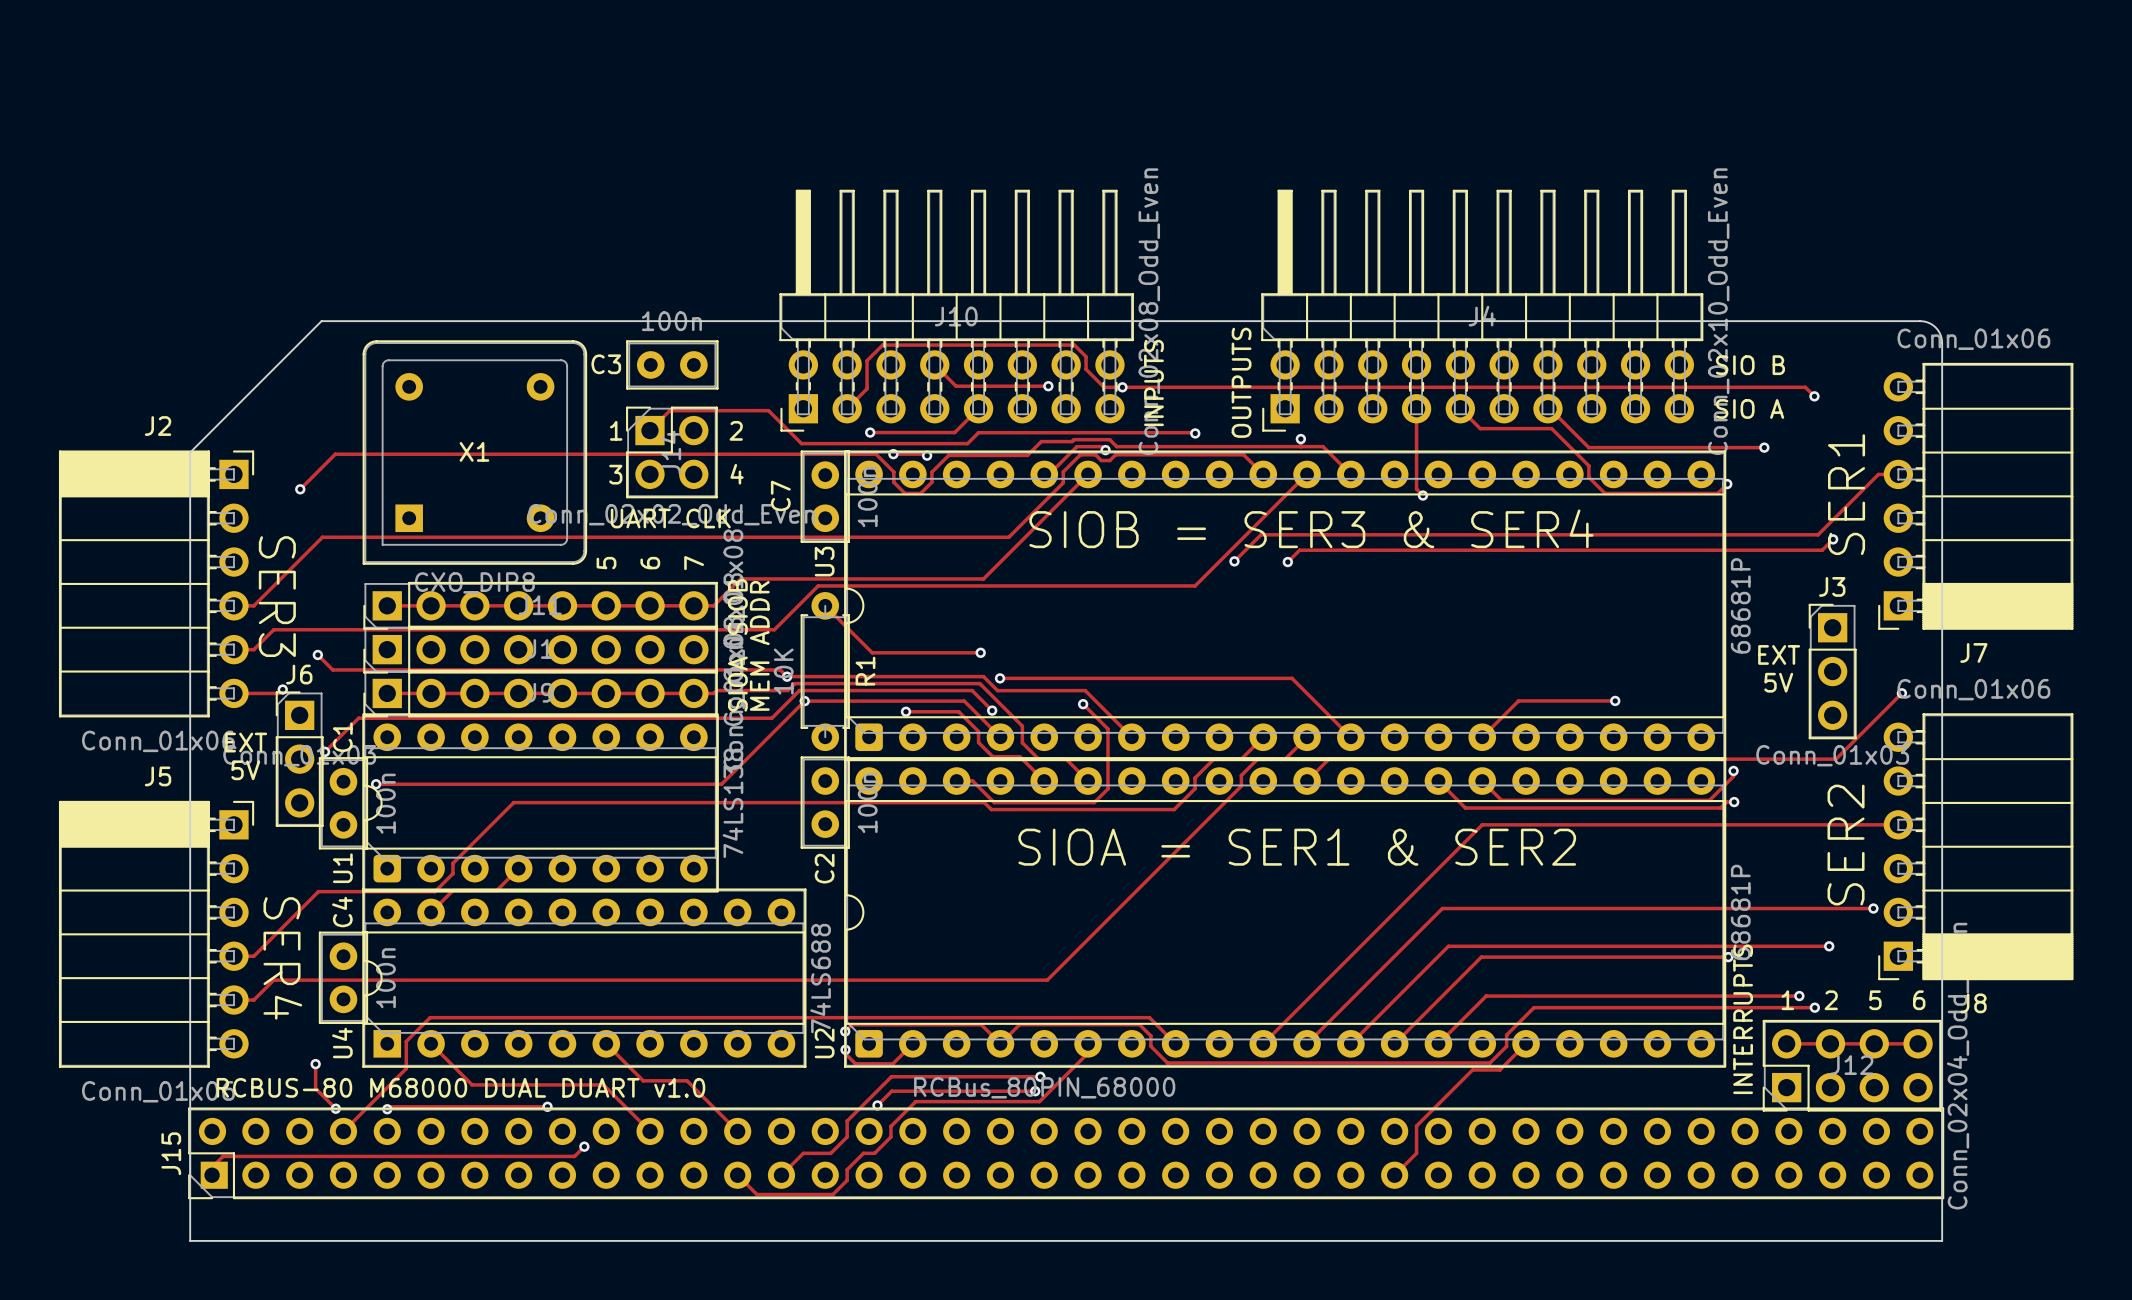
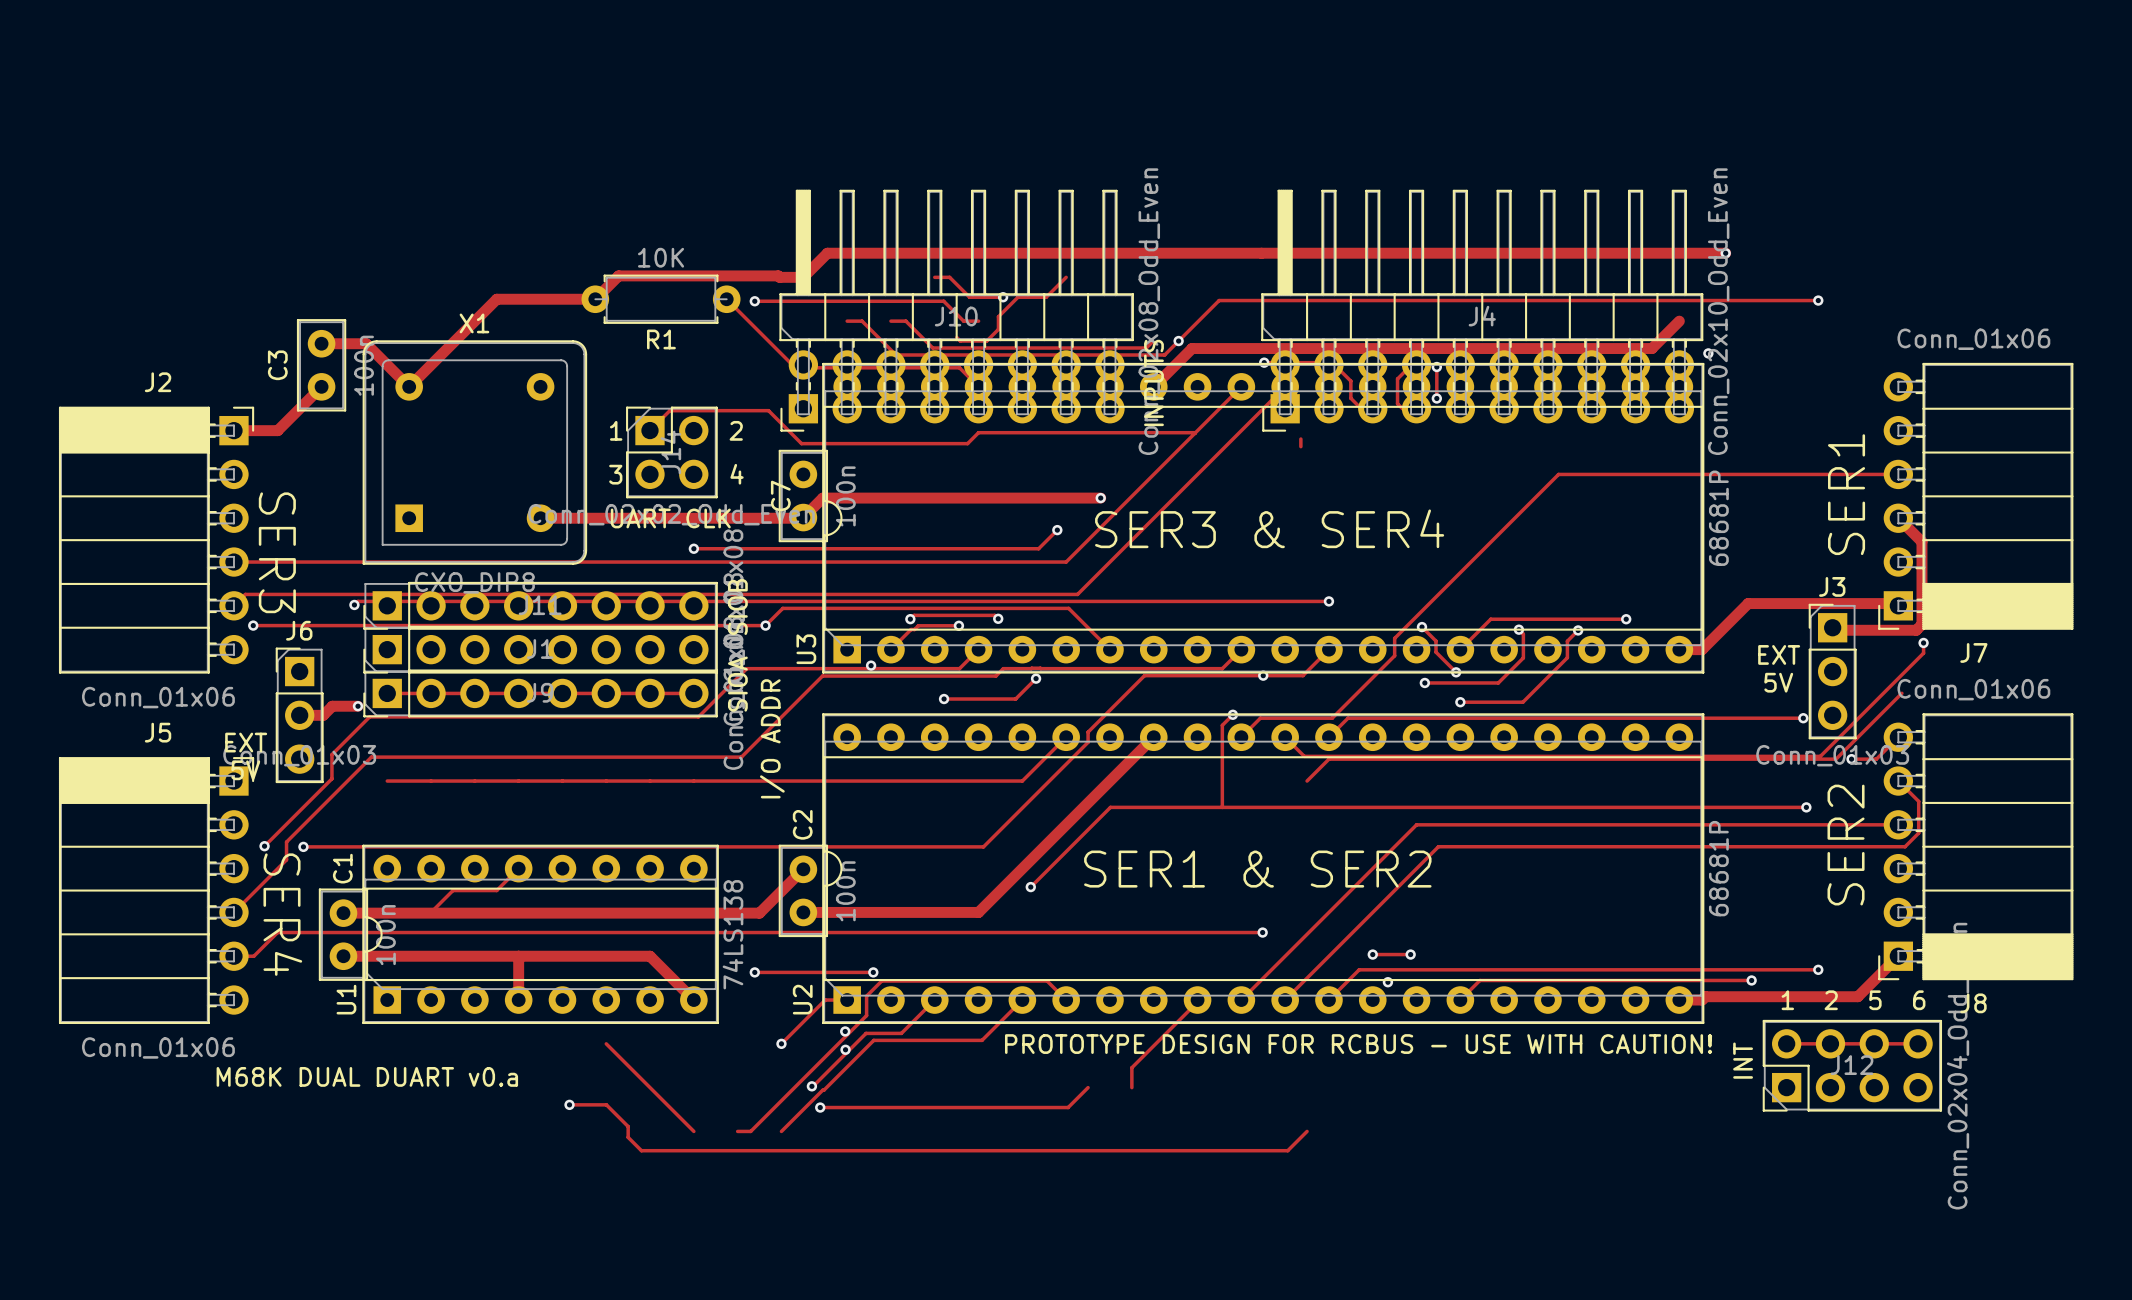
track: none -> (1725, 253) (827, 253) (803, 277) (618, 275) (595, 299) (496, 299) (409, 386) (366, 343) (321, 343)
via: none -> (1725, 253)
track: none -> (934, 277) (949, 277) (969, 297) (1003, 297)
track: none -> (1066, 277) (1046, 297) (1017, 297) (998, 316) (998, 329) (986, 341) (960, 341) (956, 337)
via: none -> (1003, 297)
track: none -> (726, 299) (795, 367) (959, 367) (978, 386)
track: none -> (1818, 300) (1219, 300) (1164, 354) (895, 354) (862, 321) (847, 321)
via: none -> (1818, 300)
track: none -> (754, 301) (943, 301) (963, 321) (978, 321)
via: none -> (754, 301)
track: none -> (890, 321) (905, 321) (932, 348) (1146, 348) (1152, 342)
track: none -> (1679, 321) (1651, 348) (1192, 348) (1153, 386)
via: none -> (1178, 341)
via: none -> (1708, 353)
track: none -> (1264, 362) (1332, 362) (1350, 381) (1350, 398) (1358, 406)
via: none -> (1264, 362)
C3 rotation: 0° (672, 364) -> 90° clockwise (321, 365)
C3 position: (672, 364) -> (321, 365)
track: (934, 364) (956, 386) (1048, 386) -> none
track: none -> (1412, 364) (1397, 378) (1397, 403) (1402, 408)
text: SIO B (1750, 365) -> none
track: none -> (1436, 367) (1436, 398)
via: none -> (1436, 367)
text: OUTPUTS (1241, 382) -> none
track: none -> (321, 386) (277, 430) (233, 430)
via: (1048, 386) -> none
track: none -> (1241, 386) (1066, 562) (233, 562)
via: (1122, 387) -> none
track: (1814, 396) (1805, 387) (1104, 387) (1086, 369) (1086, 356) (1074, 345) (882, 345) (867, 360) (867, 388) (847, 408) -> none
via: (1814, 396) -> none
via: none -> (1436, 398)
track: (978, 408) (954, 432) (870, 432) -> none
track: (1416, 408) (1416, 489) (1422, 495) -> none
track: (1460, 408) (1480, 428) (1551, 428) (1588, 465) (1588, 477) (1605, 493) (1717, 493) (1727, 484) -> none
track: (1547, 408) (1588, 447) (1764, 447) -> none
text: SIO A (1750, 408) -> none
via: (870, 432) -> none
via: (1195, 433) -> none
via: (1300, 439) -> none
via: (1764, 447) -> none
U3 footprint: [844, 450, 1727, 762] -> [822, 362, 1705, 674]
track: (1105, 450) (1102, 446) (1076, 446) (1049, 474) (1044, 474) -> none
via: (1105, 450) -> none
X1 name position: X1 (474, 451) -> X1 (474, 323)
track: (893, 454) (927, 455) -> none
via: (893, 454) -> none
via: (927, 455) -> none
track: (1088, 474) (983, 578) (740, 578) (713, 605) (387, 605) -> none
track: (1263, 474) (1243, 454) (1115, 454) (1109, 460) (1101, 460) (1095, 454) (1080, 454) (1063, 471) (1063, 482) (1008, 537) (322, 537) (253, 605) (233, 605) -> (1285, 386) (1077, 594) (245, 594) (233, 605)
track: (1306, 474) (1195, 585) (818, 585) (774, 629) (273, 629) (253, 649) (233, 649) -> none
track: (1350, 474) (1323, 446) (1116, 446) (1109, 439) (1073, 439) (1072, 441) (1041, 441) (1027, 455) (948, 455) (931, 472) (931, 482) (920, 493) (904, 493) (893, 482) (893, 471) (876, 454) (335, 454) (300, 489) -> none
track: (1878, 474) (1818, 534) (1261, 534) (1234, 561) -> (1878, 474) (1558, 474) (1394, 638) (1394, 655) (1332, 718) (1260, 718) (1241, 737)
via: (1727, 484) -> none
via: (300, 489) -> none
via: (1422, 495) -> none
C7 position: (825, 496) -> (803, 496)
track: none -> (1100, 498) (822, 498) (802, 518) (540, 518)
via: none -> (1100, 498)
track: none -> (1898, 518) (1921, 541) (1921, 624) (1916, 630) (1835, 630) (1832, 627)
text: SIOB = SER3 & SER4 (1311, 528) -> SER3 & SER4 (1269, 528)
track: none -> (1057, 530) (1038, 548) (693, 548)
via: none -> (1057, 530)
track: (1833, 539) (1822, 550) (1299, 550) (1287, 562) -> none
via: (1833, 539) -> none
via: none -> (693, 548)
U3 name position: U3 (824, 561) -> U3 (806, 649)
via: (1234, 561) -> none
via: (1287, 562) -> none
text: 5 (606, 563) -> none
text: 6 (650, 563) -> none
text: 7 (694, 563) -> none
J2 position: (156, 583) -> (156, 540)
text position: SER3 (277, 596) -> SER3 (277, 552)
track: none -> (1328, 601) (357, 601) (354, 604)
via: none -> (1328, 601)
via: none -> (354, 604)
track: (825, 605) (872, 652) (980, 652) -> none
track: none -> (1898, 605) (1896, 603) (1748, 603) (1702, 649) (1679, 649)
track: none -> (998, 618) (994, 615) (914, 615) (910, 619)
via: none -> (998, 618)
via: none -> (910, 619)
track: none -> (1626, 619) (1490, 619) (1460, 649)
via: none -> (1626, 619)
track: none -> (253, 625) (765, 625) (782, 608) (1068, 608) (1109, 649)
via: none -> (253, 625)
via: none -> (765, 625)
track: none -> (958, 625) (918, 625) (914, 629) (911, 629) (890, 649)
via: none -> (958, 625)
track: none -> (1421, 627) (1436, 641) (1436, 652) (1456, 672)
via: none -> (1421, 627)
track: none -> (1518, 629) (1523, 634) (1523, 657) (1498, 682) (1424, 682)
via: none -> (1518, 629)
track: none -> (1578, 630) (1567, 641) (1567, 657) (1522, 702) (1460, 702)
via: none -> (1578, 630)
track: none -> (1923, 642) (1923, 653) (1820, 756) (1304, 756) (1285, 737)
via: none -> (1923, 642)
text: MEM ADDR (759, 645) -> I/O ADDR (772, 738)
track: none -> (978, 649) (959, 668) (746, 668) (698, 716) (369, 716) (331, 754) (331, 778) (264, 846)
track: none -> (1241, 649) (1222, 668) (1003, 668) (995, 676) (822, 676) (741, 757) (371, 757) (286, 842) (286, 859) (233, 912)
track: none -> (1328, 649) (1302, 675) (1144, 675) (1088, 732) (1088, 742) (983, 846) (303, 846)
via: (980, 652) -> none
track: (317, 654) (332, 669) (780, 669) (787, 676) -> none
via: (317, 654) -> none
via: none -> (871, 665)
R1 rotation: 0° (825, 671) -> 90° clockwise (661, 299)
R1 position: (825, 671) -> (661, 299)
via: none -> (1456, 672)
via: none -> (1263, 675)
track: (787, 676) (983, 676) (997, 690) (1085, 690) (1131, 737) -> none
via: (787, 676) -> none
track: (1000, 678) (1292, 678) (1350, 737) -> none
via: (1000, 678) -> none
track: none -> (1036, 678) (1015, 699) (944, 699)
via: none -> (1036, 678)
via: none -> (1424, 682)
track: (282, 689) (278, 693) (233, 693) -> none
via: (282, 689) -> none
track: (693, 693) (713, 693) (716, 690) (787, 690) (794, 683) (979, 683) (1022, 726) (1022, 742) (1038, 759) (1066, 759) (1088, 781) -> none
via: (1901, 693) -> none
via: none -> (944, 699)
track: (1615, 700) (1518, 700) (1482, 737) -> none
via: (1615, 700) -> none
via: (804, 701) -> none
via: none -> (1460, 702)
track: (1083, 704) (1108, 729) (1108, 788) (1094, 802) (994, 802) (972, 781) -> (1066, 737) (1022, 781) (972, 781)
via: (1083, 704) -> none
track: none -> (357, 706) (332, 706) (323, 715) (299, 715)
via: none -> (357, 706)
track: (992, 710) (972, 690) (799, 690) (771, 718) (358, 718) (325, 751) -> none
via: (992, 710) -> none
track: (905, 711) (958, 711) (978, 731) (978, 742) (992, 756) (1019, 756) (1044, 781) -> none
via: (905, 711) -> none
U1 footprint: [362, 713, 719, 893] -> [362, 844, 719, 1025]
track: none -> (1232, 714) (1222, 725) (1222, 807)
via: none -> (1232, 714)
track: none -> (1803, 718) (1347, 718) (1328, 737)
via: none -> (1803, 718)
track: (1000, 737) (964, 701) (804, 701) (721, 784) (376, 784) -> none
track: none -> (1153, 737) (978, 912) (803, 912)
track: (1263, 737) (1241, 759) (1213, 759) (1195, 778) (1195, 788) (1174, 809) (991, 809) (984, 802) (513, 802) (452, 863) (452, 873) (434, 891) (318, 891) (277, 932) -> (1262, 932) (277, 932)
track: (1307, 737) (1285, 759) (1257, 759) (1241, 775) (1241, 786) (1047, 980) (273, 980) (253, 1000) (233, 1000) -> none
track: none -> (1898, 737) (1876, 759) (1851, 759)
via: (325, 751) -> none
U2 footprint: [844, 757, 1727, 1068] -> [822, 713, 1705, 1025]
J6 position: (299, 759) -> (299, 715)
via: none -> (1851, 759)
track: (1733, 770) (1733, 776) (1709, 800) (1501, 800) (1482, 781) -> none
via: (1733, 770) -> none
track: none -> (387, 781) (956, 781)
J15: RCBus_80PIN_68000 (1066, 781) -> none
track: (1438, 781) (1465, 808) (1720, 808) (1726, 802) (1734, 802) -> none
track: none -> (1898, 781) (1918, 801) (1918, 833) (1905, 846) (1438, 846) (1285, 1000)
via: (376, 784) -> none
C2 position: (825, 802) -> (803, 890)
via: (1734, 802) -> none
C1 position: (343, 803) -> (343, 934)
track: none -> (1806, 807) (1110, 807) (1030, 887)
via: none -> (1806, 807)
track: (1482, 824) (1263, 1043) -> (1482, 824) (1416, 824) (1241, 1000)
via: none -> (264, 846)
via: none -> (303, 846)
text: SIOA = SER1 & SER2 (1297, 847) -> SER1 & SER2 (1257, 869)
C2 name position: C2 (824, 868) -> C2 (802, 824)
track: none -> (803, 869) (759, 913) (343, 913)
via: none -> (1030, 887)
track: (1873, 908) (1442, 908) (1307, 1043) -> none
via: (1873, 908) -> none
via: none -> (1262, 932)
J5 position: (156, 934) -> (156, 890)
track: (1829, 946) (1448, 946) (1350, 1043) -> none
via: (1829, 946) -> none
track: none -> (1372, 954) (1410, 954)
via: none -> (1372, 954)
via: none -> (1410, 954)
track: none -> (343, 956) (650, 956) (693, 1000)
track: none -> (518, 956) (518, 1000)
track: none -> (1898, 956) (1857, 996) (1705, 996) (1702, 1000) (1679, 1000)
track: (1728, 957) (1481, 957) (1394, 1043) -> none
via: (1728, 957) -> none
text position: SER4 (282, 958) -> SER4 (282, 914)
track: none -> (1818, 969) (1359, 969) (1328, 1000)
via: none -> (1818, 969)
track: none -> (754, 972) (873, 972)
via: none -> (754, 972)
via: none -> (873, 972)
C4: 100n (343, 977) -> none
U4: 74LS688 (584, 978) -> none
track: none -> (1751, 980) (1479, 980) (1460, 1000)
via: none -> (1751, 980)
via: none -> (1387, 982)
track: (1799, 996) (1486, 996) (1438, 1043) -> none
via: (1799, 996) -> none
track: none -> (847, 1000) (825, 1000) (781, 1043)
track: none -> (934, 1000) (901, 1033) (866, 1033) (811, 1086)
track: none -> (1022, 1000) (982, 1040) (873, 1040) (781, 1131)
track: none -> (1066, 1000) (1047, 981) (881, 981) (866, 996) (866, 1015) (750, 1131) (737, 1131)
track: none -> (1197, 1000) (1131, 1067) (1131, 1087)
track: (1814, 1007) (1533, 1007) (1506, 1035) (1506, 1046) (1490, 1062) (1167, 1062) (1150, 1046) (1150, 1035) (1139, 1024) (1019, 1024) (1000, 1043) (981, 1024) (851, 1024) (845, 1031) -> none
via: (1814, 1007) -> none
text: INTERRUPTS (1743, 1019) -> INT (1743, 1060)
track: (431, 1043) (472, 1084) (603, 1084) (650, 1131) -> none
via: none -> (781, 1043)
track: (912, 1043) (892, 1063) (855, 1063) (845, 1053) (845, 1049) -> none
track: (1175, 1043) (1149, 1017) (430, 1017) (406, 1041) (406, 1068) (343, 1130) -> none
track: (1526, 1043) (1499, 1069) (1472, 1069) (1416, 1126) (1416, 1153) (1394, 1175) -> none
text: none -> PROTOTYPE DESIGN FOR RCBUS - USE WITH CAUTION! (1358, 1044)
track: (1088, 1053) (1039, 1101) (915, 1101) (890, 1126) (890, 1137) (874, 1153) (863, 1153) (847, 1169) (847, 1180) (832, 1194) (756, 1194) (737, 1175) -> none
track: (315, 1064) (315, 1088) (335, 1108) -> none
via: (315, 1064) -> none
track: (1040, 1076) (891, 1076) (847, 1121) (847, 1137) (830, 1153) (803, 1153) (781, 1175) -> none
via: (1040, 1076) -> none
track: (643, 1080) (687, 1080) (737, 1131) -> (643, 1080) (693, 1131)
via: none -> (811, 1086)
text: RCBUS-80 M68000 DUAL DUART v1.0 (460, 1087) -> M68K DUAL DUART v0.a (367, 1076)
track: none -> (1088, 1087) (1068, 1107) (820, 1107)
track: (1035, 1091) (891, 1091) (877, 1105) -> none
via: (1035, 1091) -> none
track: none -> (569, 1104) (606, 1104) (628, 1126) (628, 1137) (641, 1150) (1287, 1150) (1307, 1131)
via: none -> (569, 1104)
via: (877, 1105) -> none
track: (547, 1106) (388, 1106) (387, 1109) -> none
via: (547, 1106) -> none
via: none -> (820, 1107)
via: (335, 1108) -> none
via: (387, 1109) -> none
track: (584, 1146) (574, 1156) (223, 1156) (212, 1167) (212, 1175) -> none
via: (584, 1146) -> none

